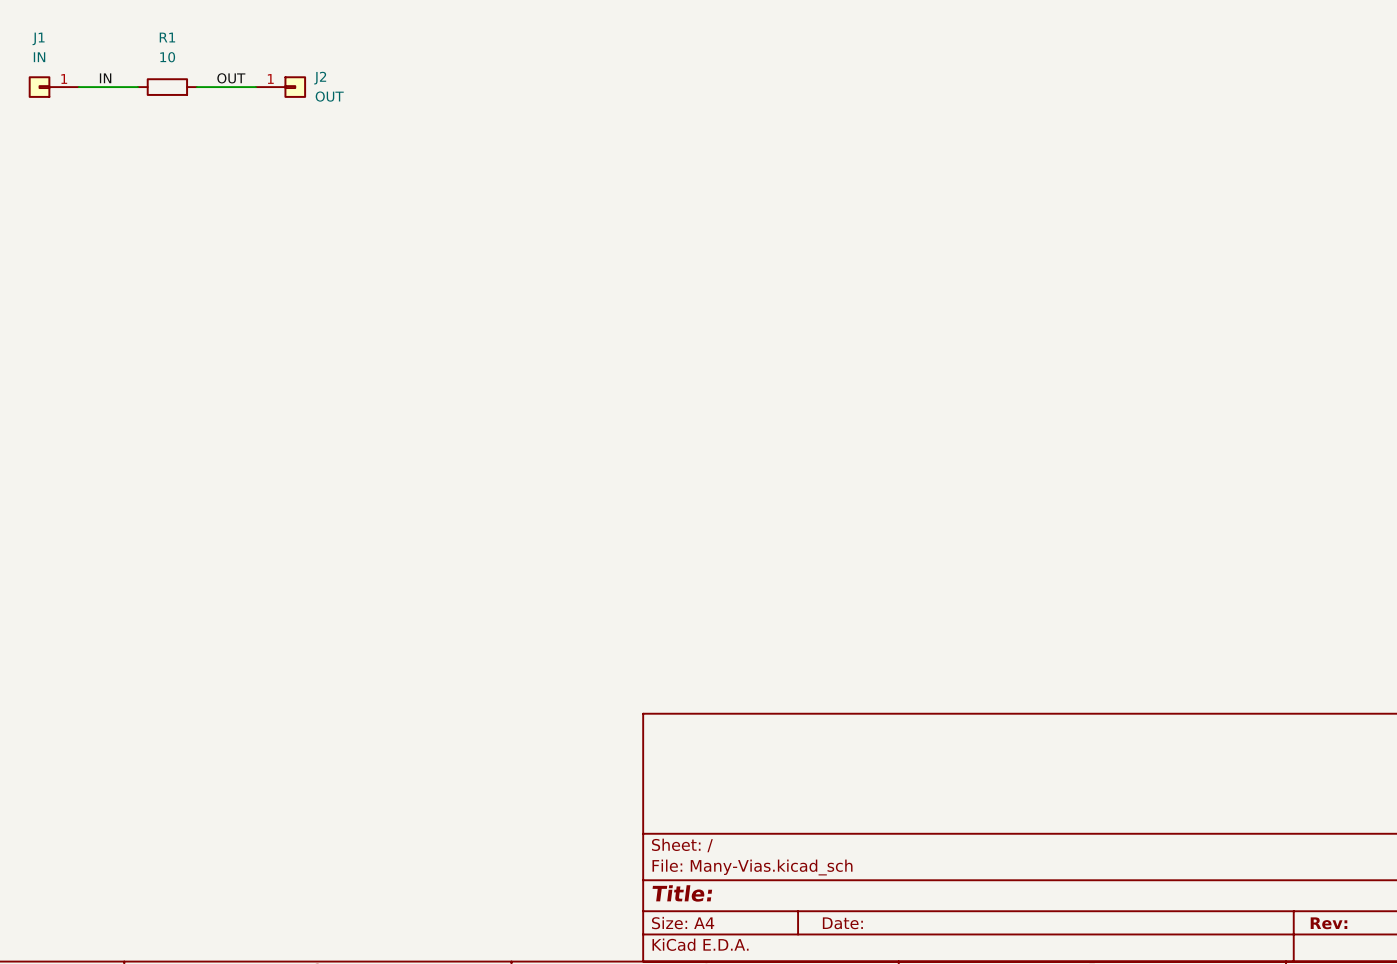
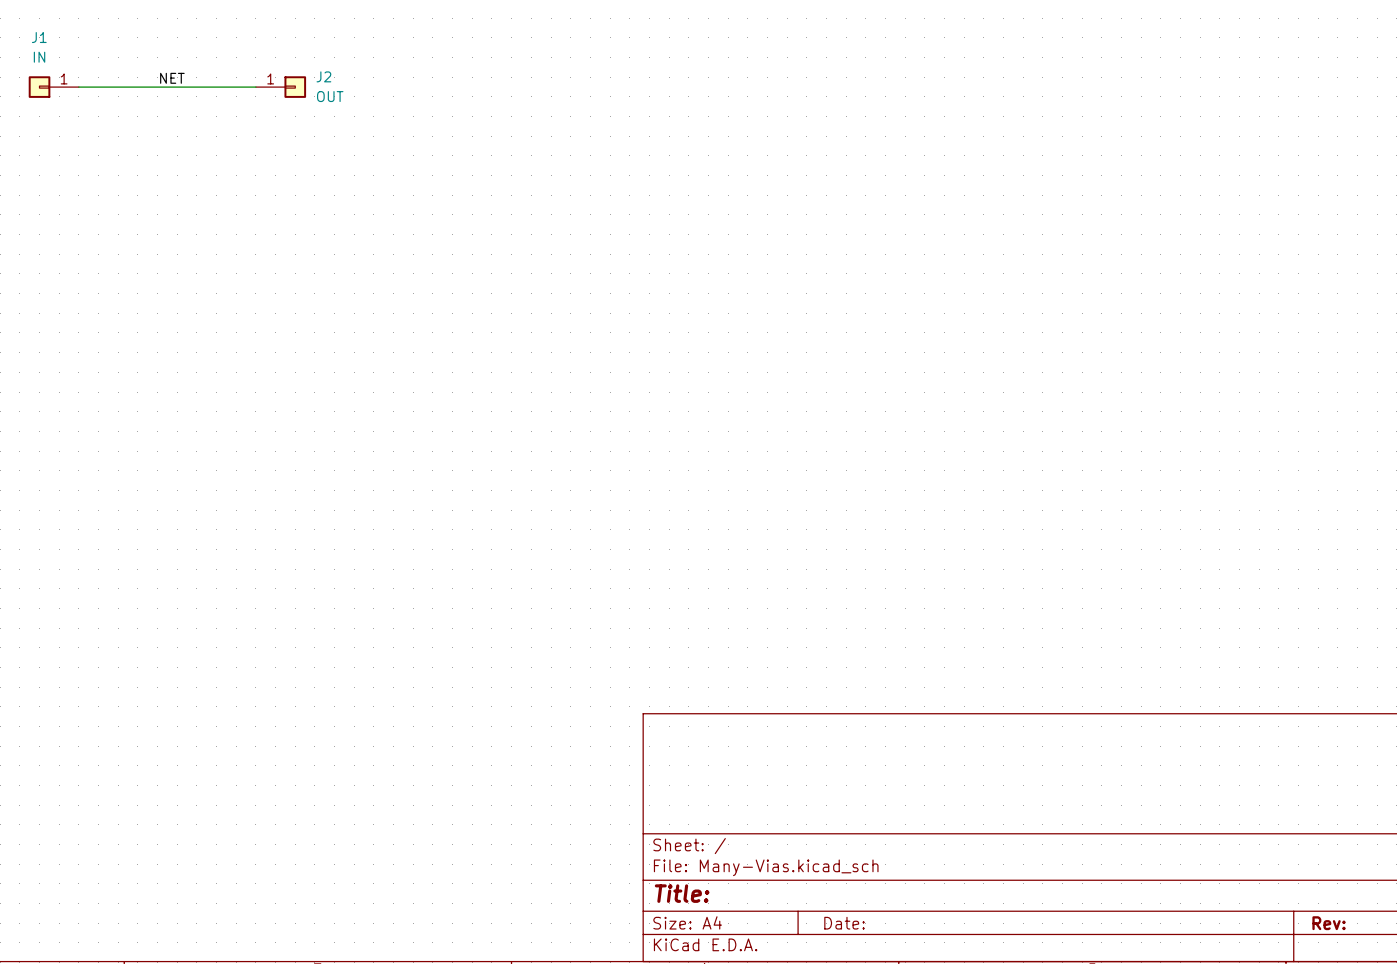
label: IN (105, 78) -> none
label: none -> NET (172, 78)
label: OUT (231, 78) -> none
wire: none -> (137, 87) (196, 87)
R1: 10 (167, 87) -> none

